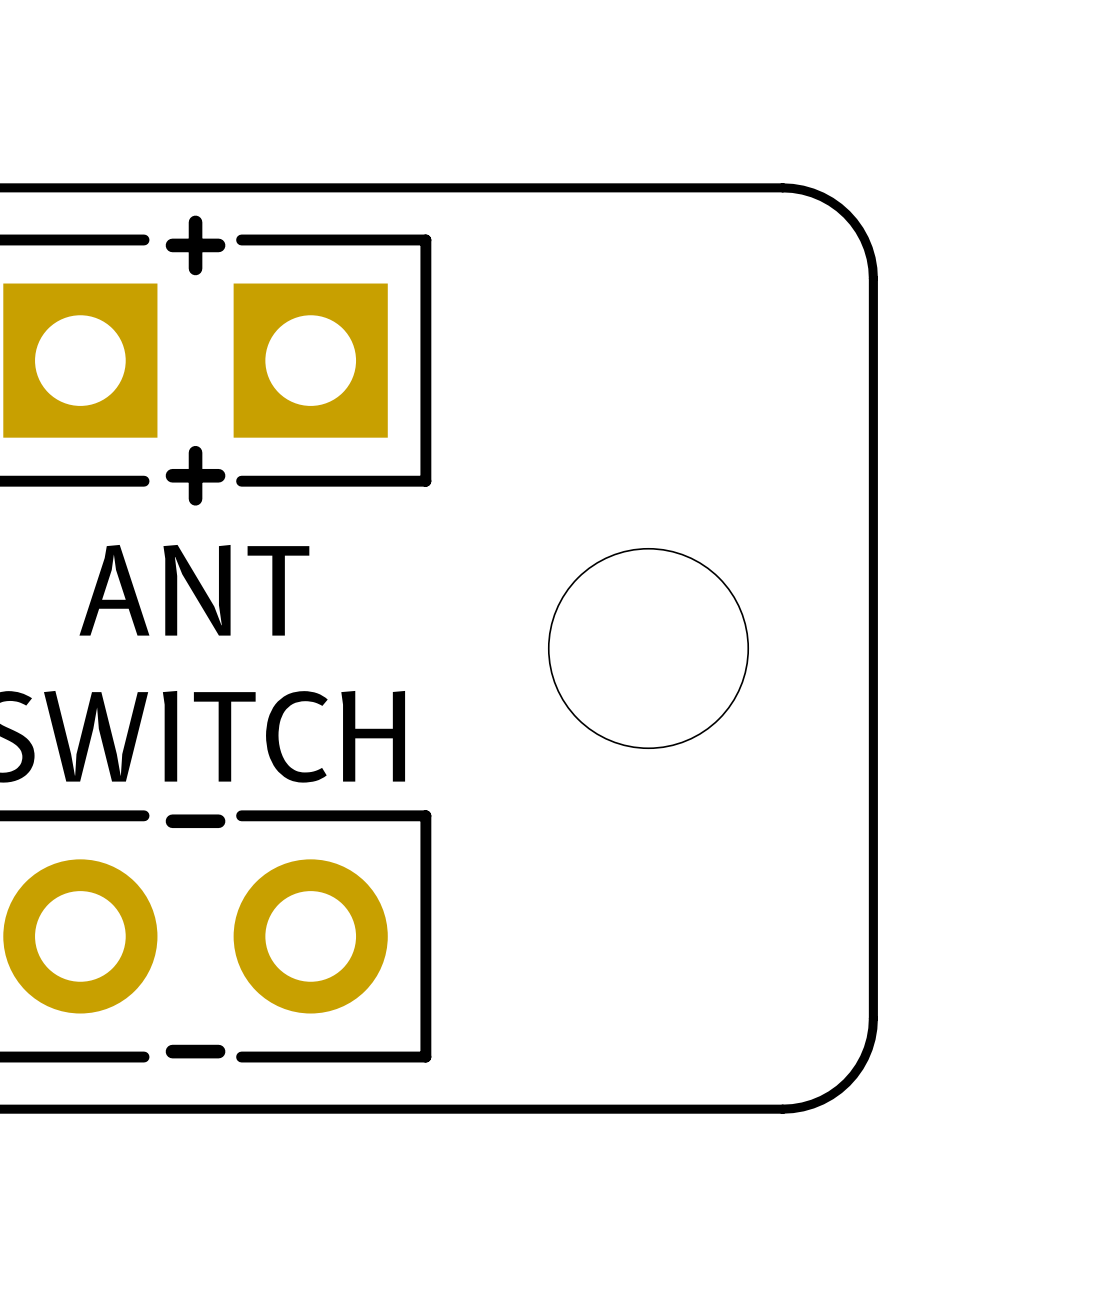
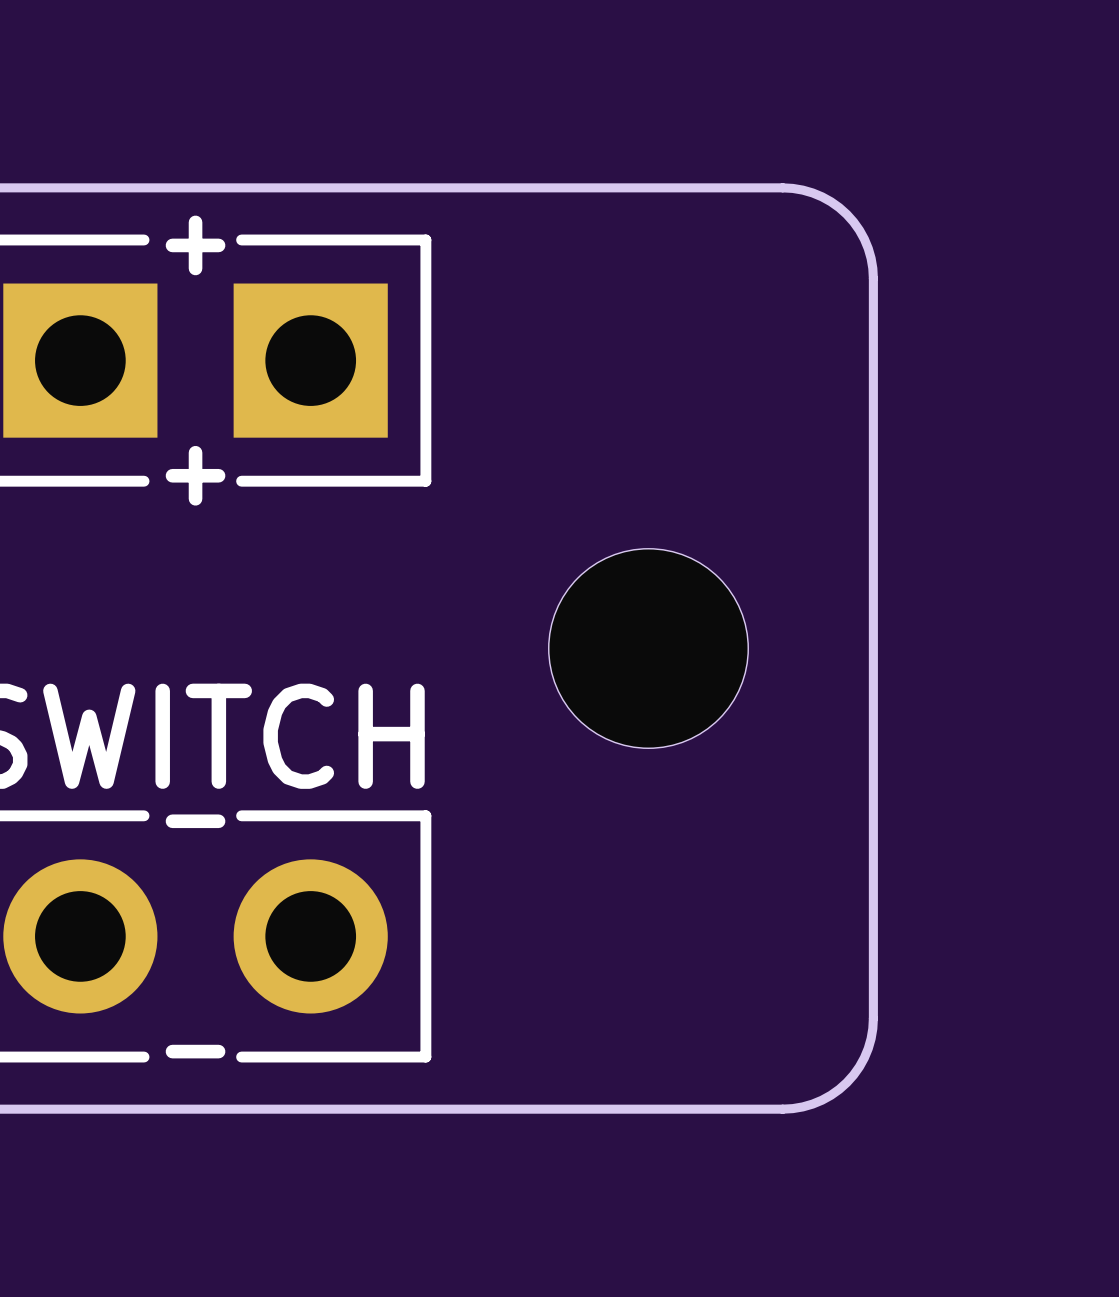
text: ANT (194, 590) -> none

